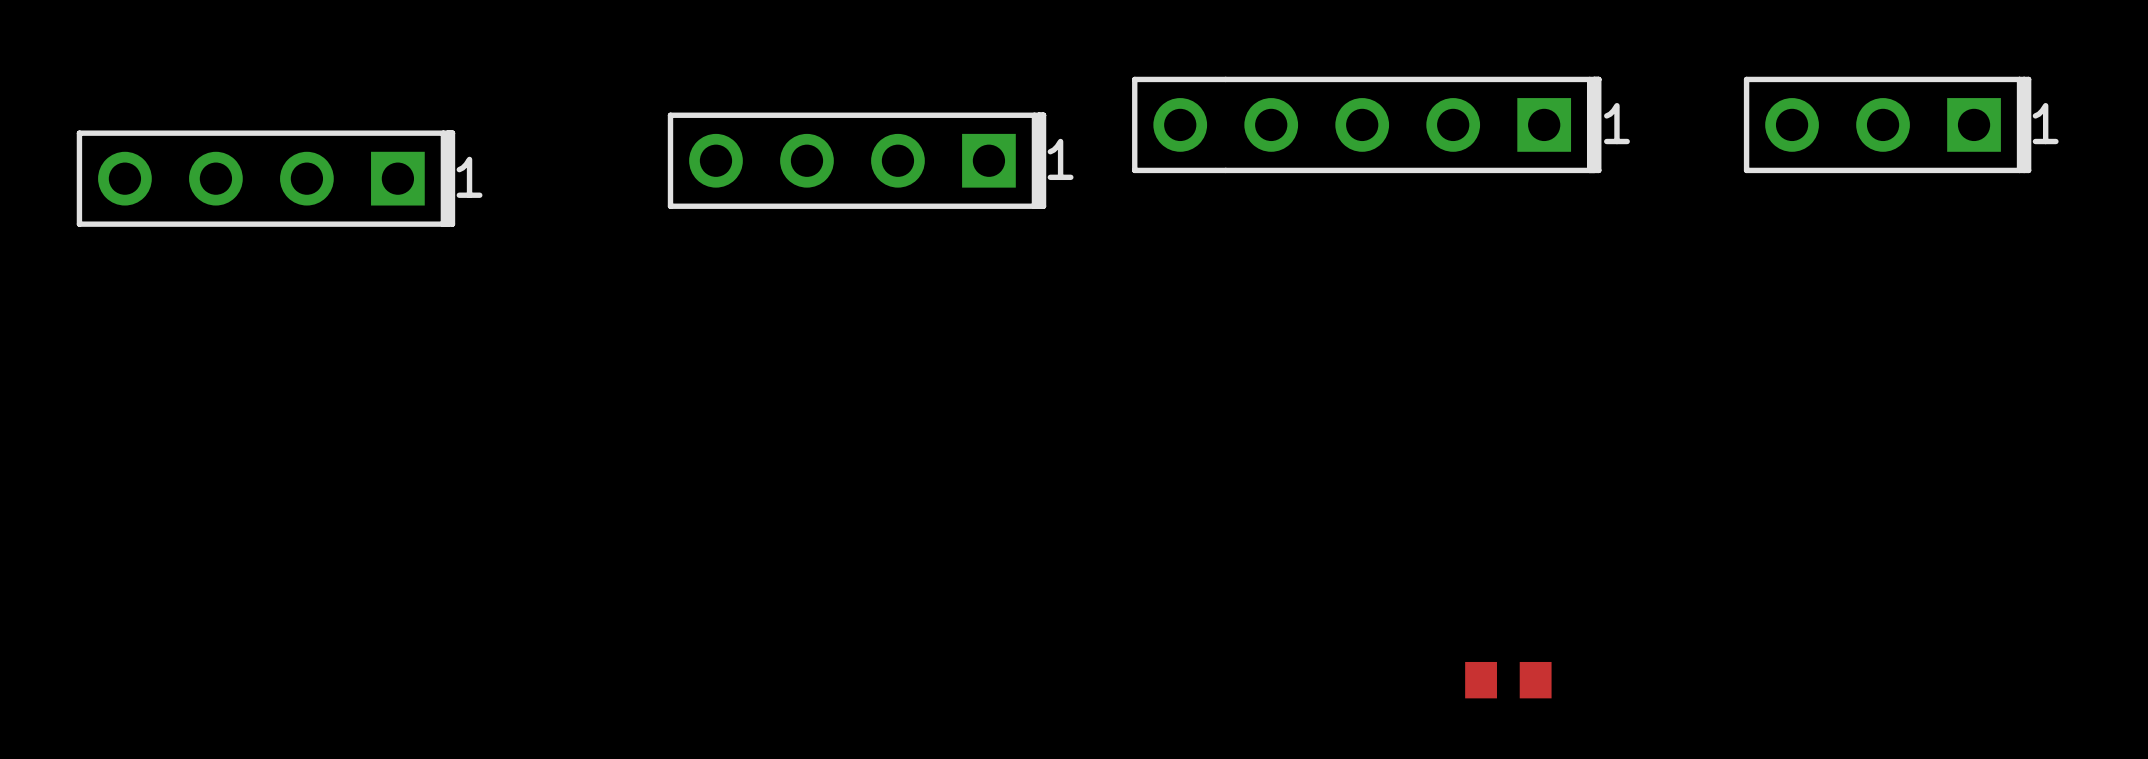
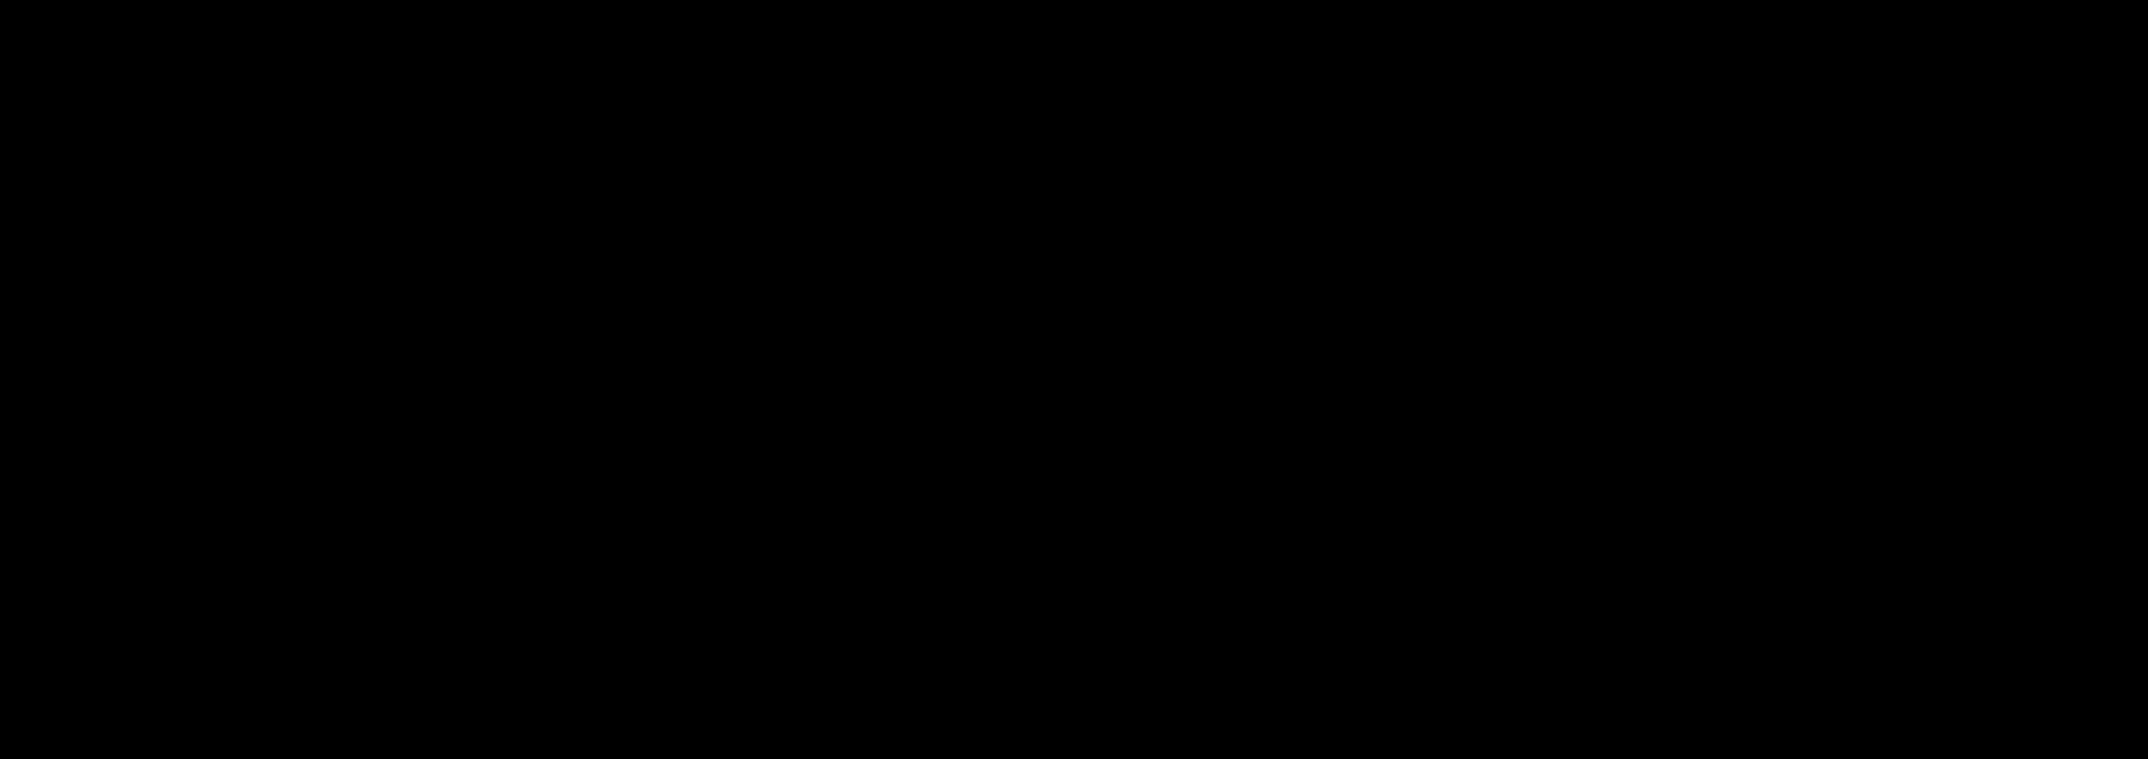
part: (1366, 124) -> none
part: (1887, 124) -> none
part: (857, 160) -> none
part: (265, 178) -> none
part: (1508, 680) -> none

